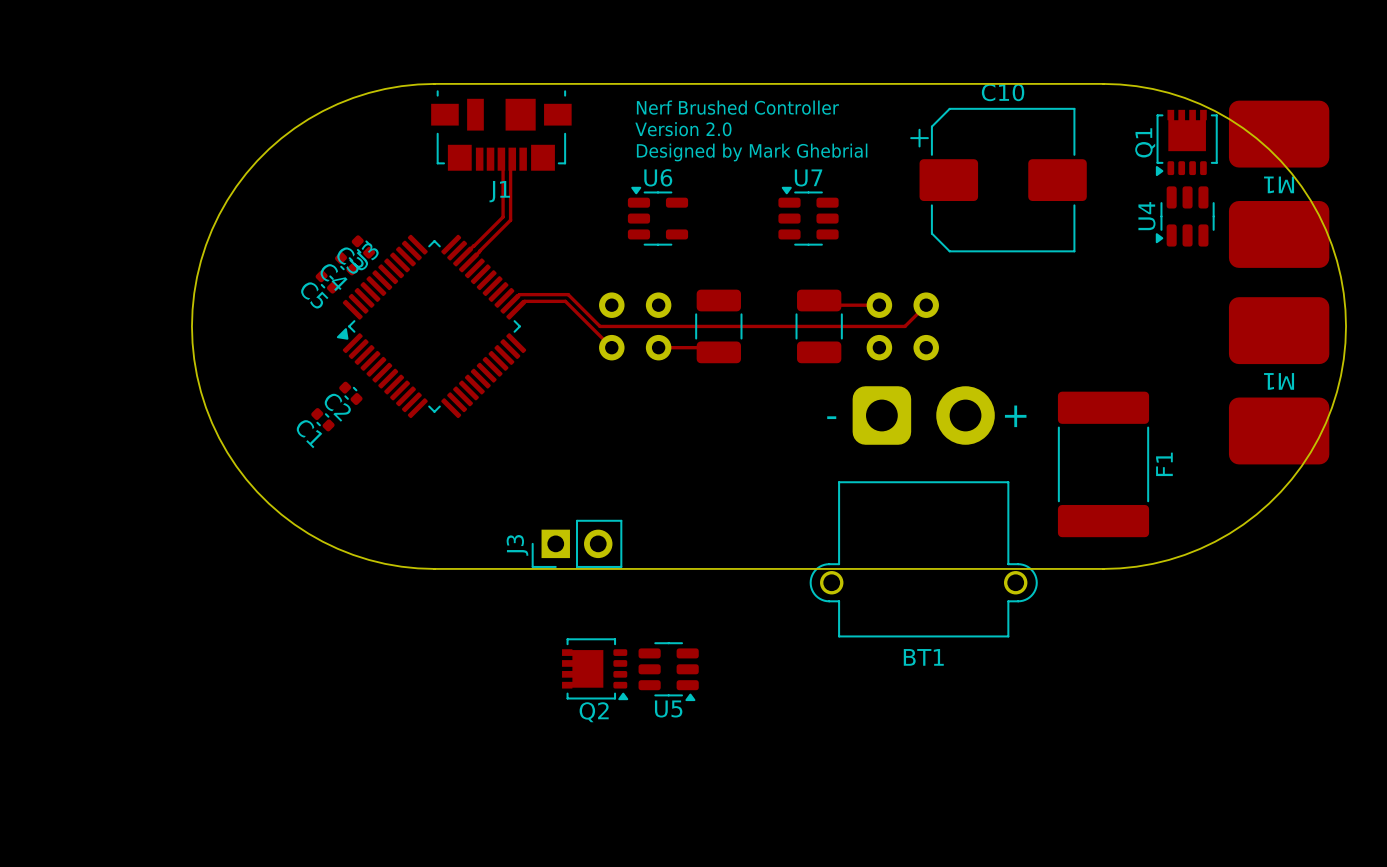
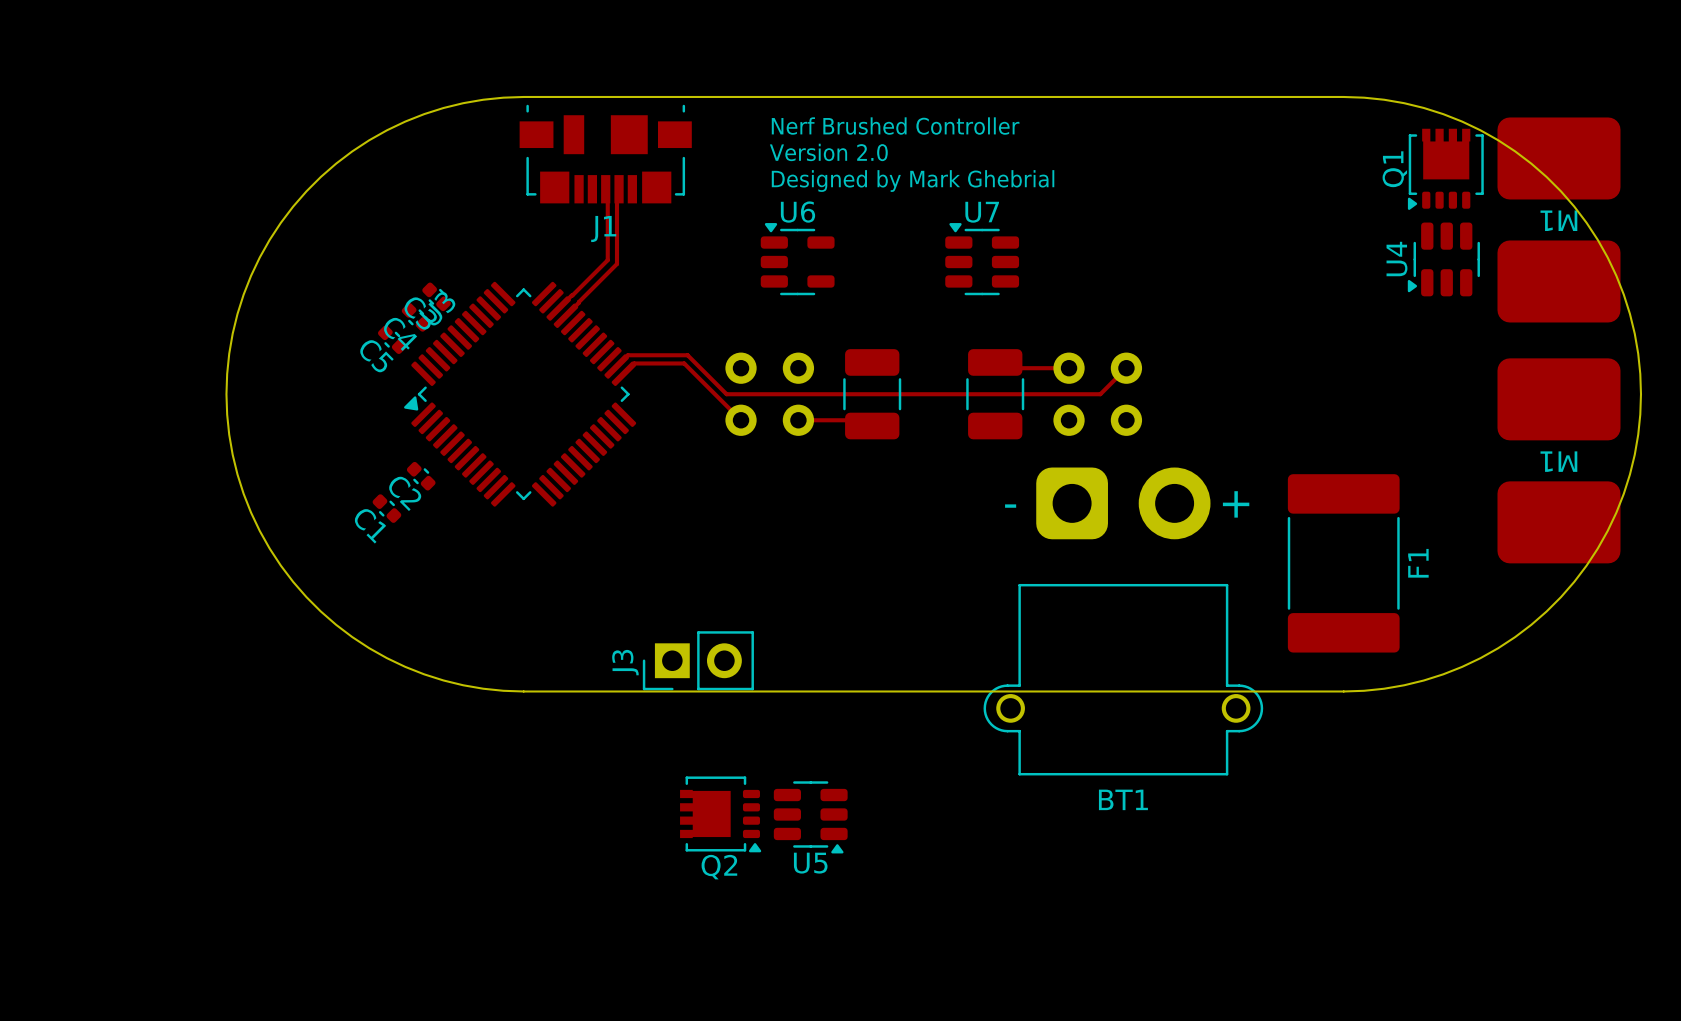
C10: (998, 180) -> none

